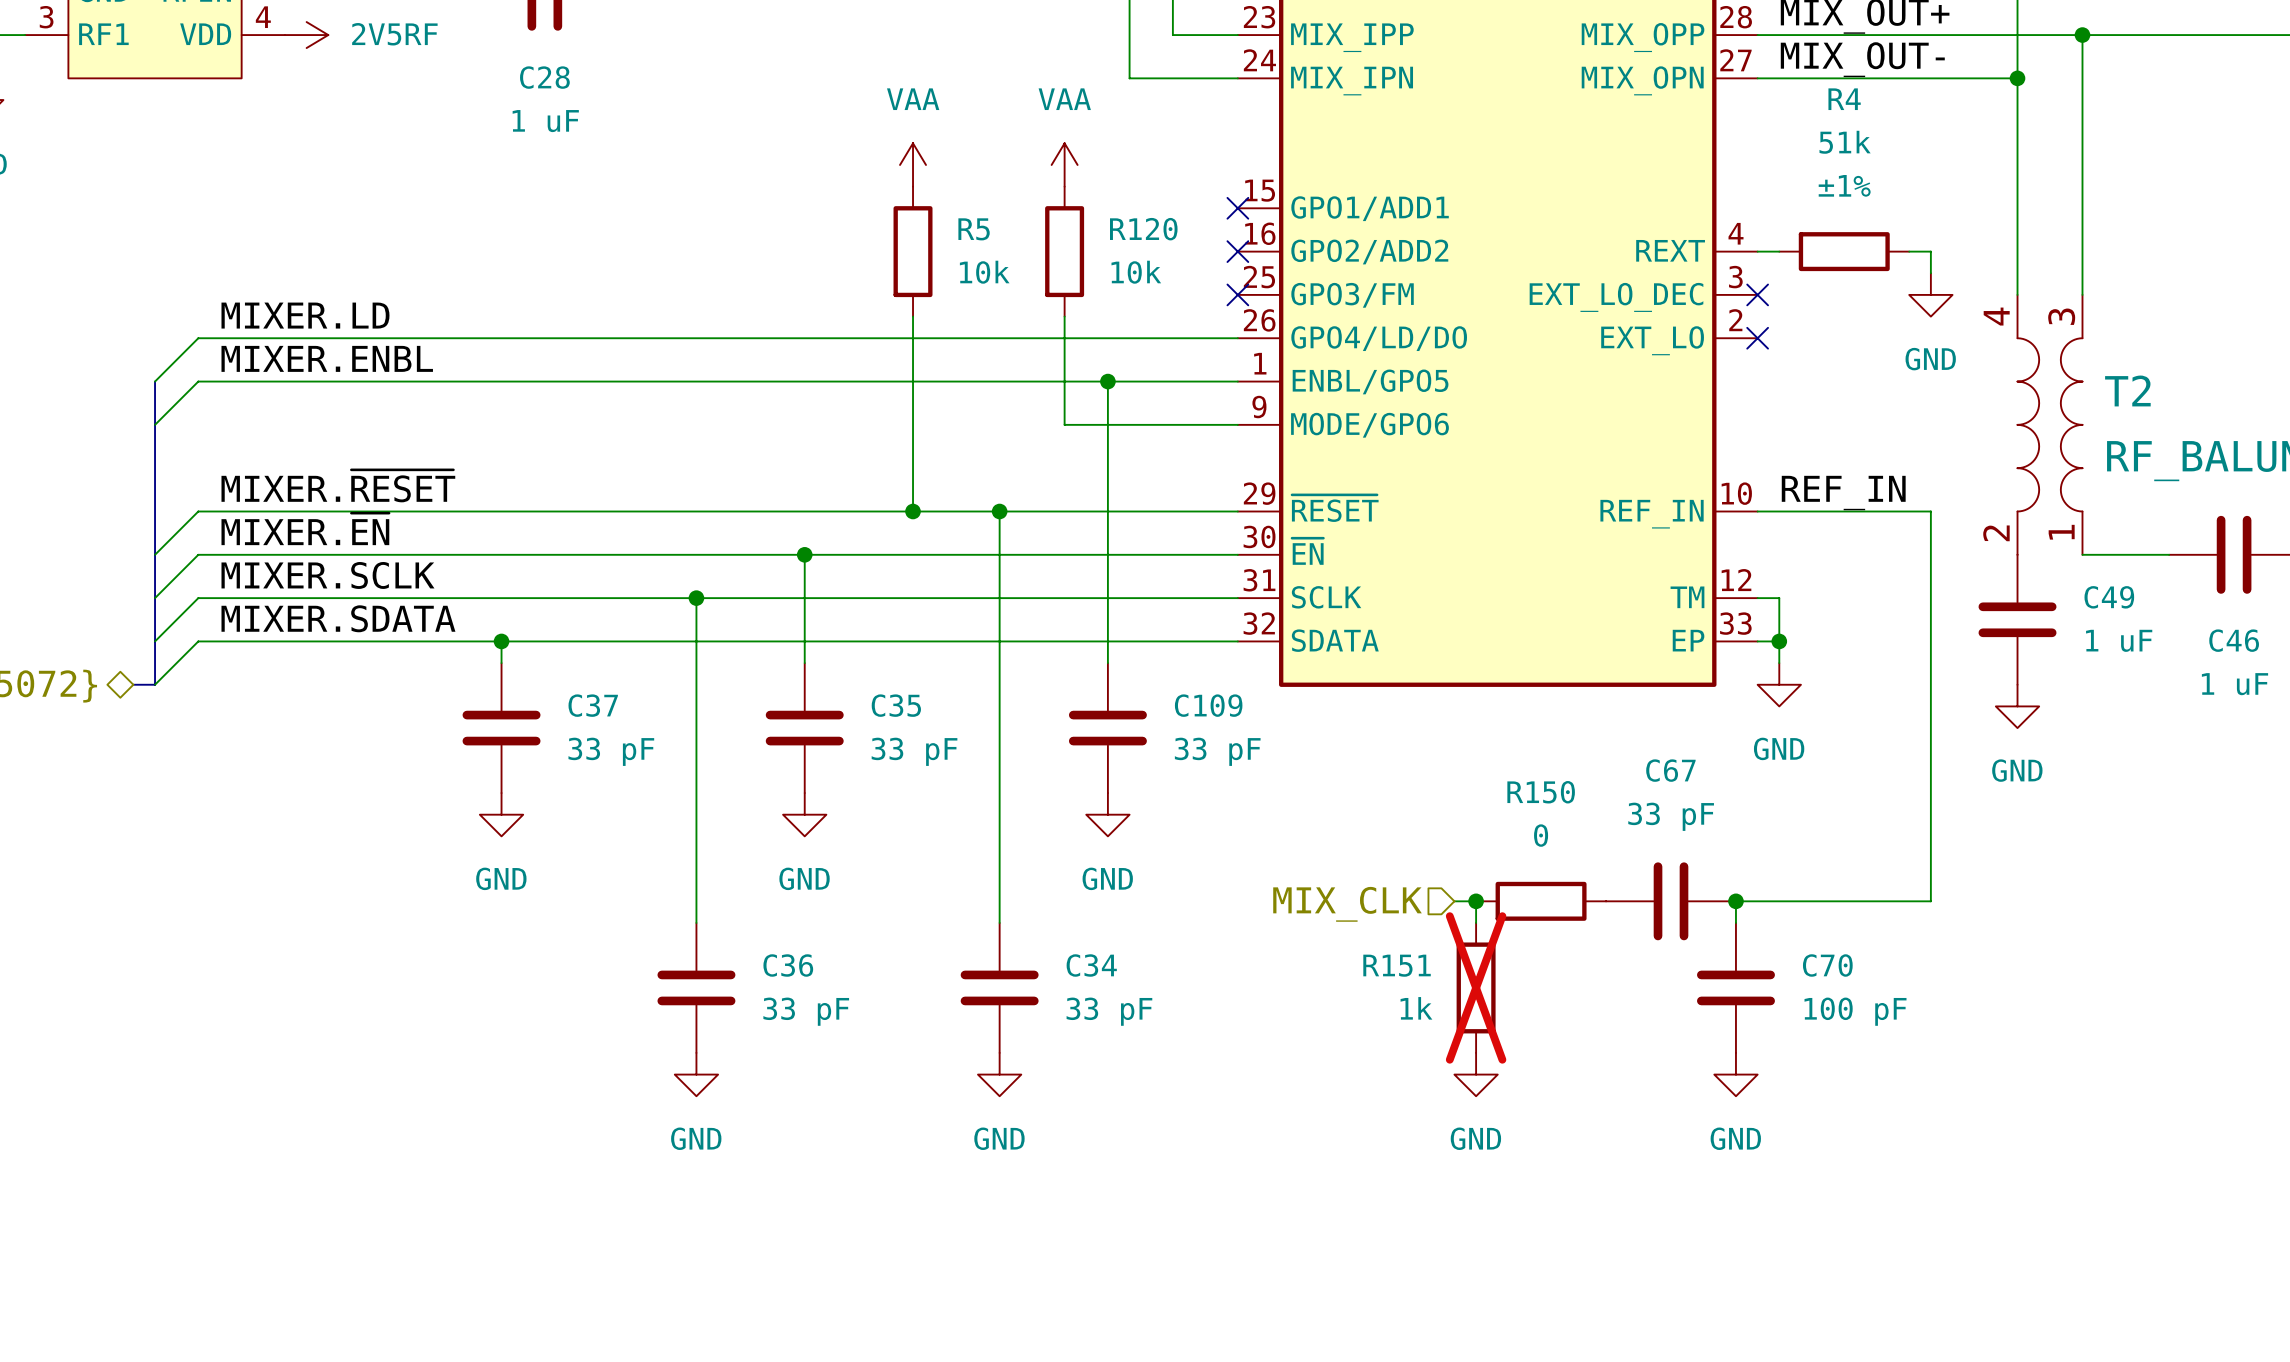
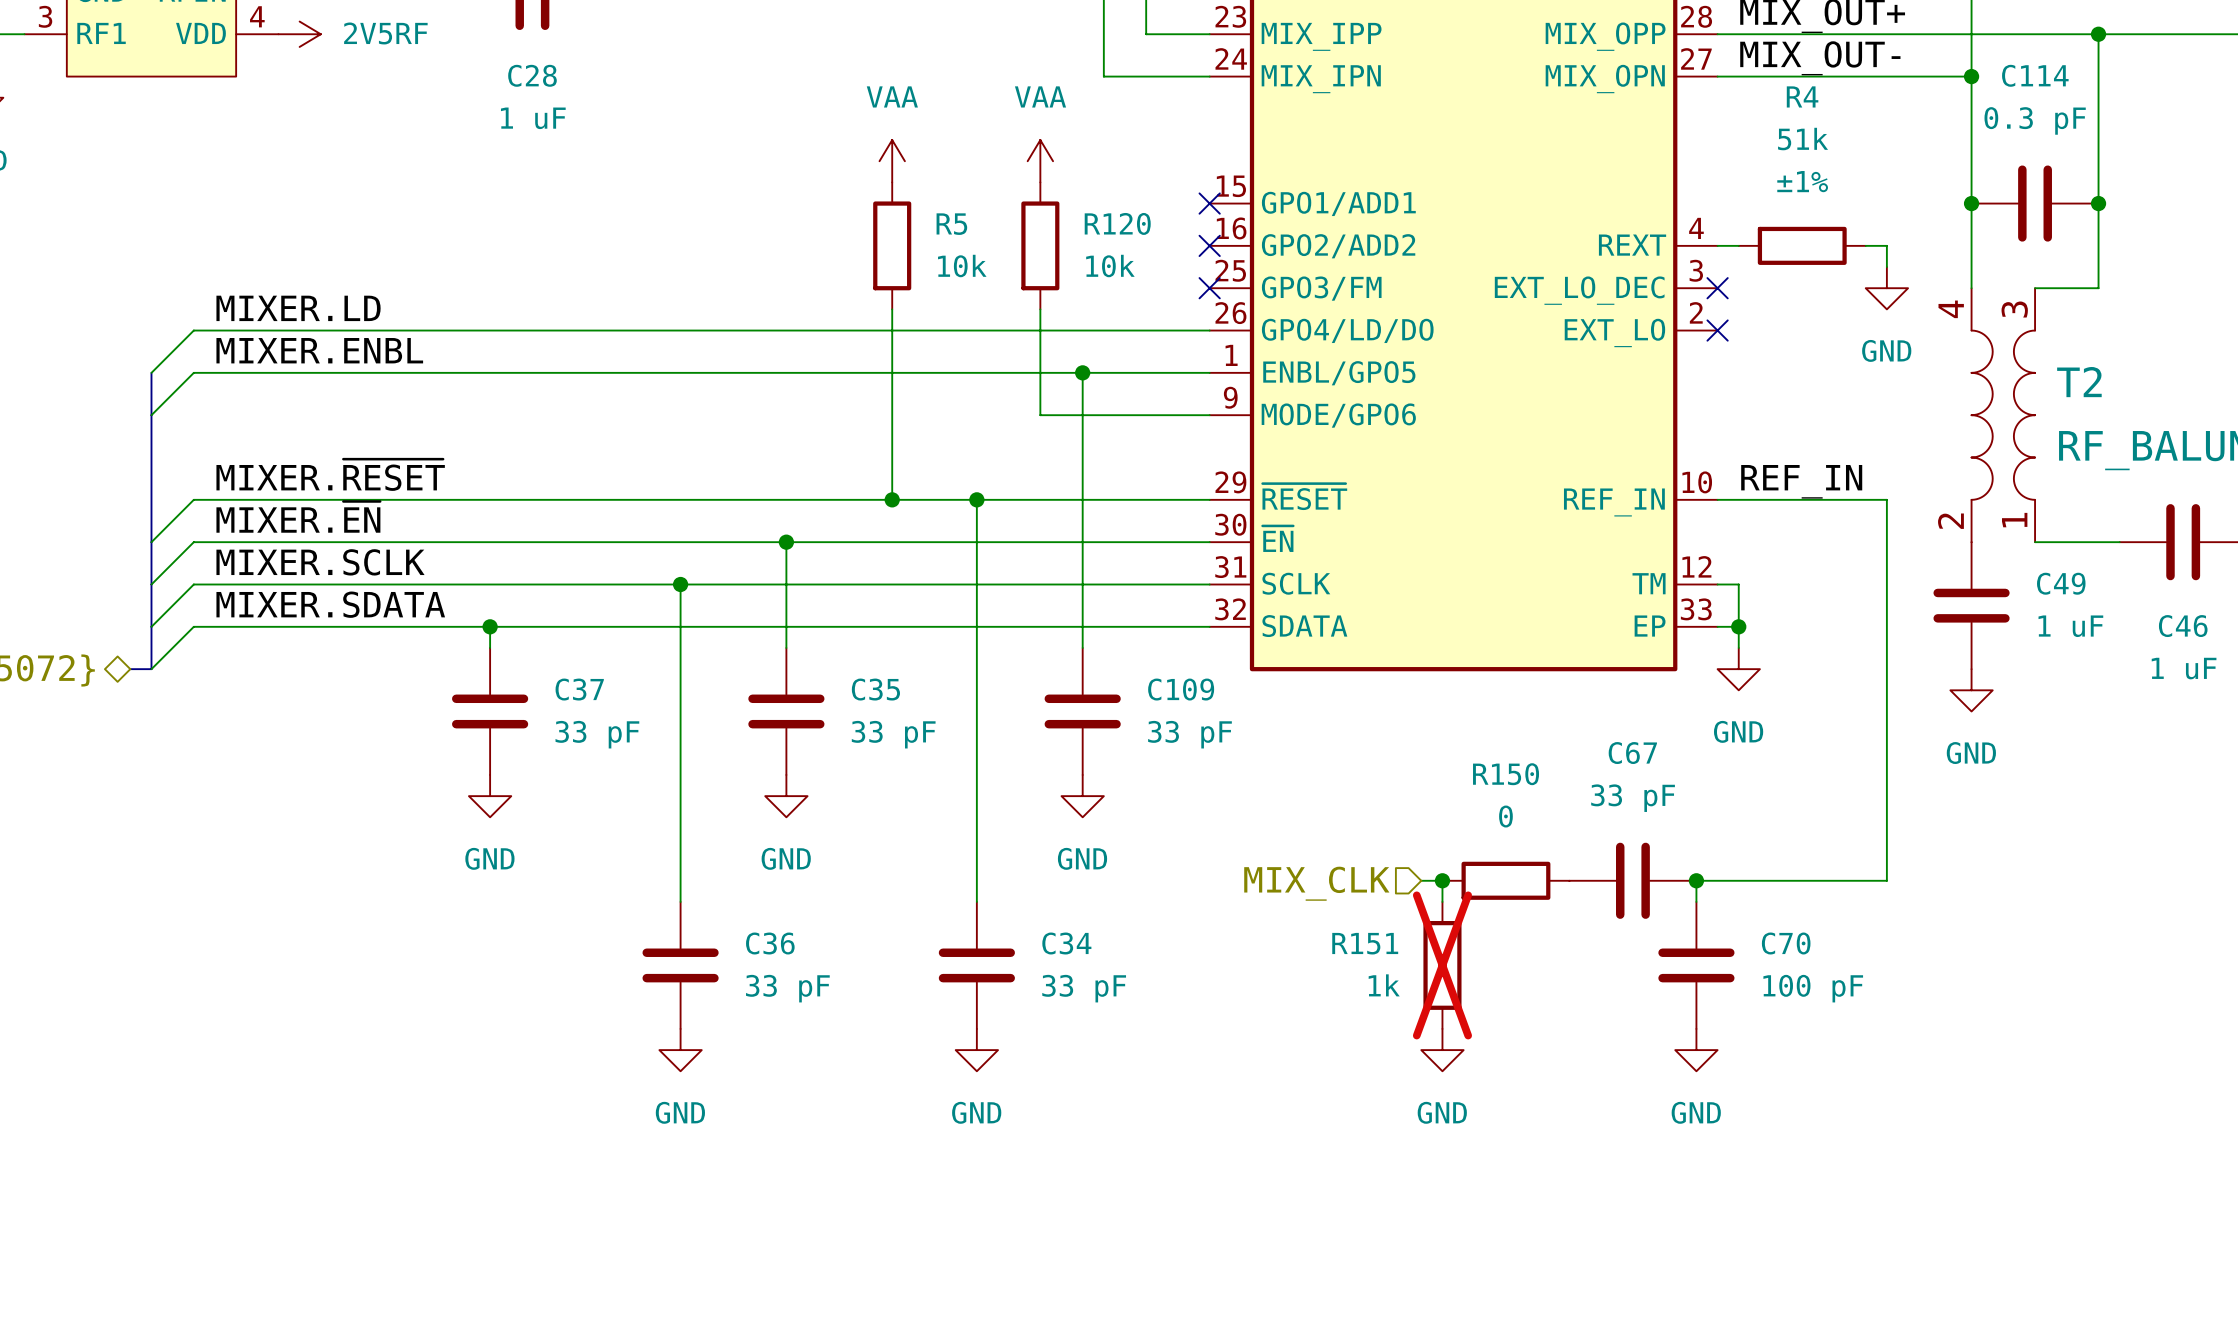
wire: (2082, 35) (2082, 294) -> (2098, 34) (2098, 288) (2035, 288)
junction position: (2082, 35) -> (2098, 34)
junction: none -> (1971, 203)
C114: none -> 0.3 pF (2035, 203)
junction: none -> (2098, 203)

